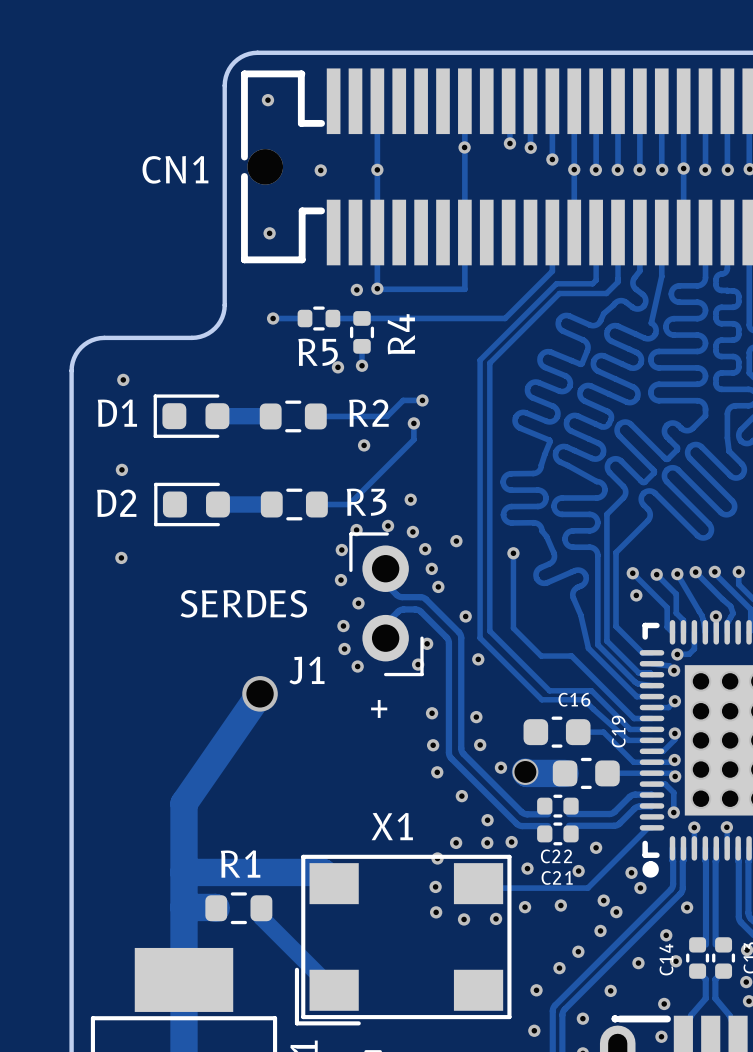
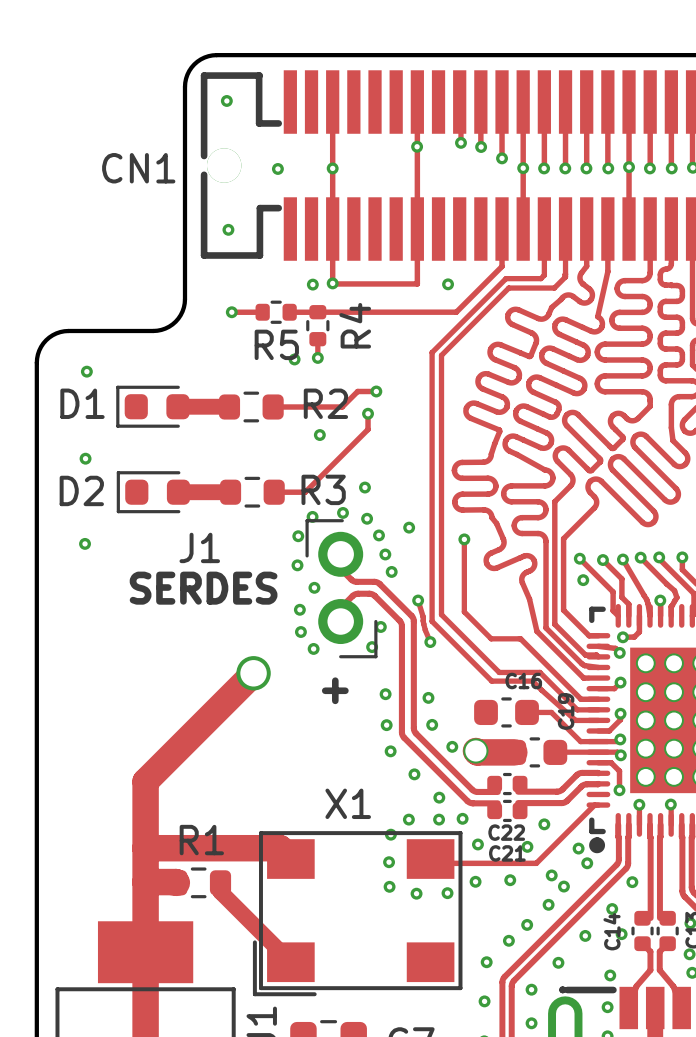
via: none -> (448, 284)
track: none -> (418, 600) (430, 642)
J1 name position: J1 (306, 670) -> J1 (199, 547)
track: (260, 693) (183, 803) -> (255, 672) (145, 781)
via position: (260, 693) -> (253, 673)

